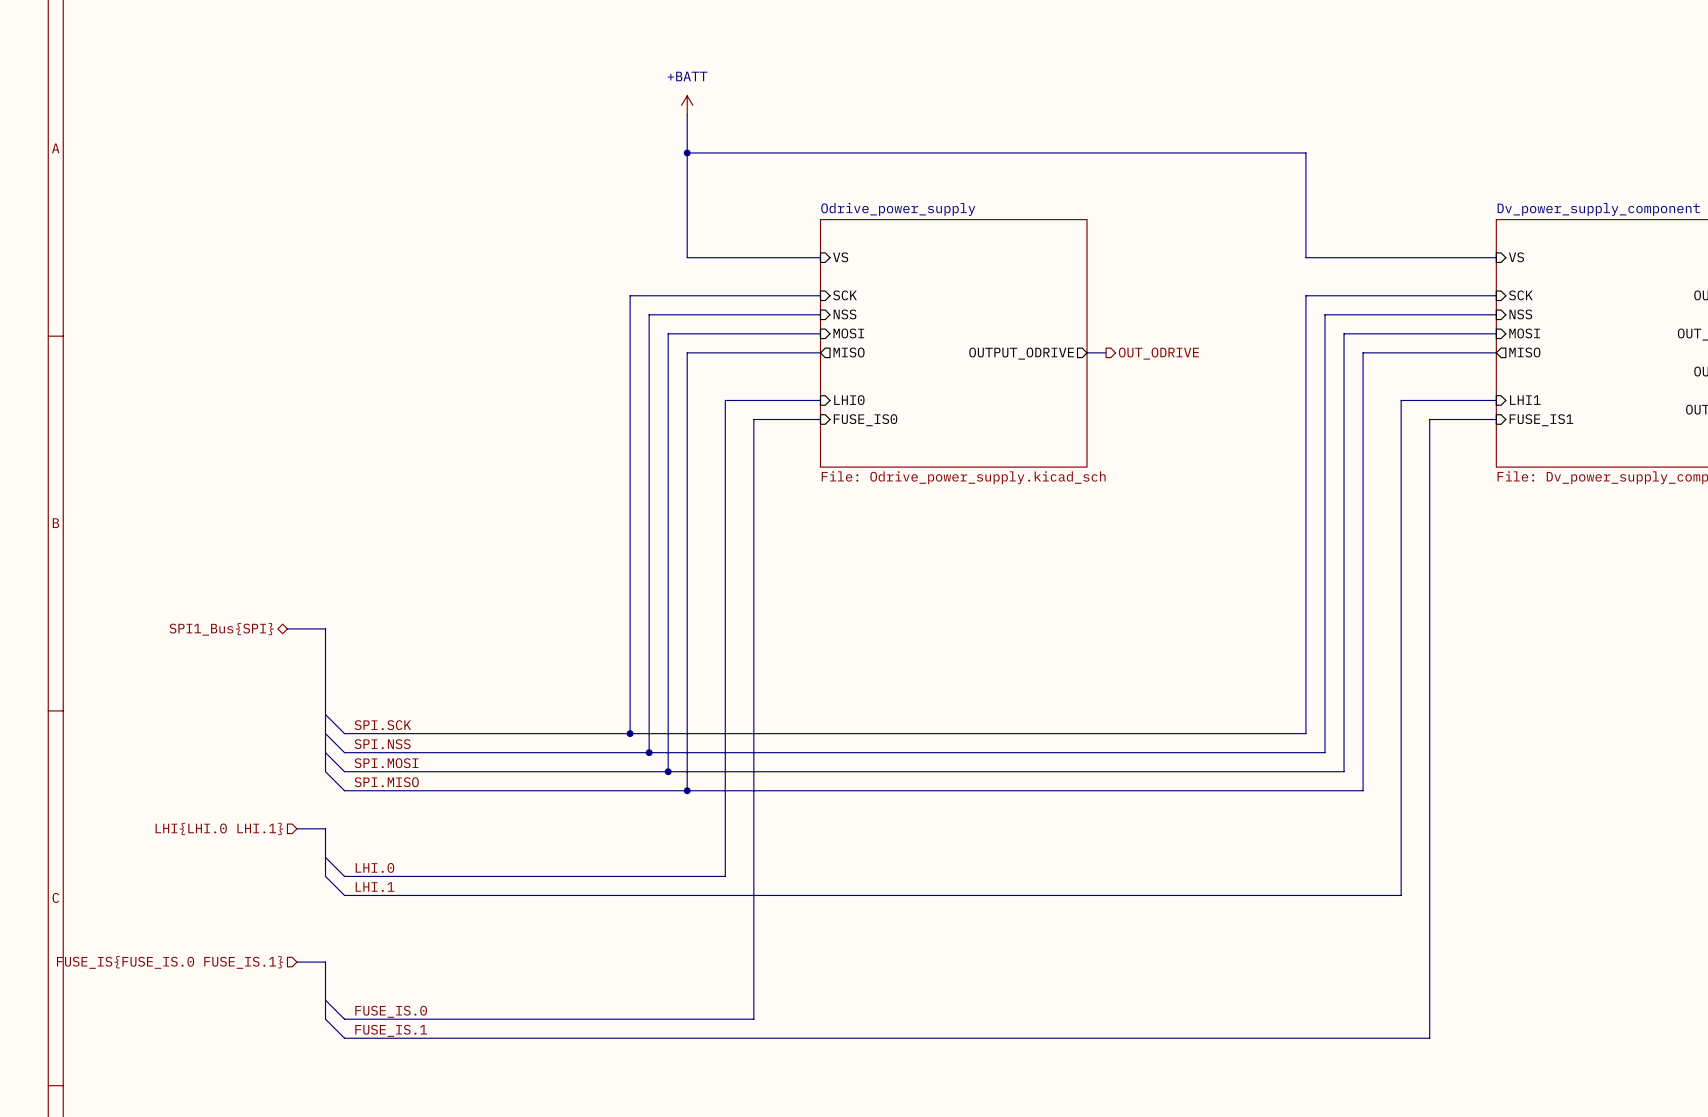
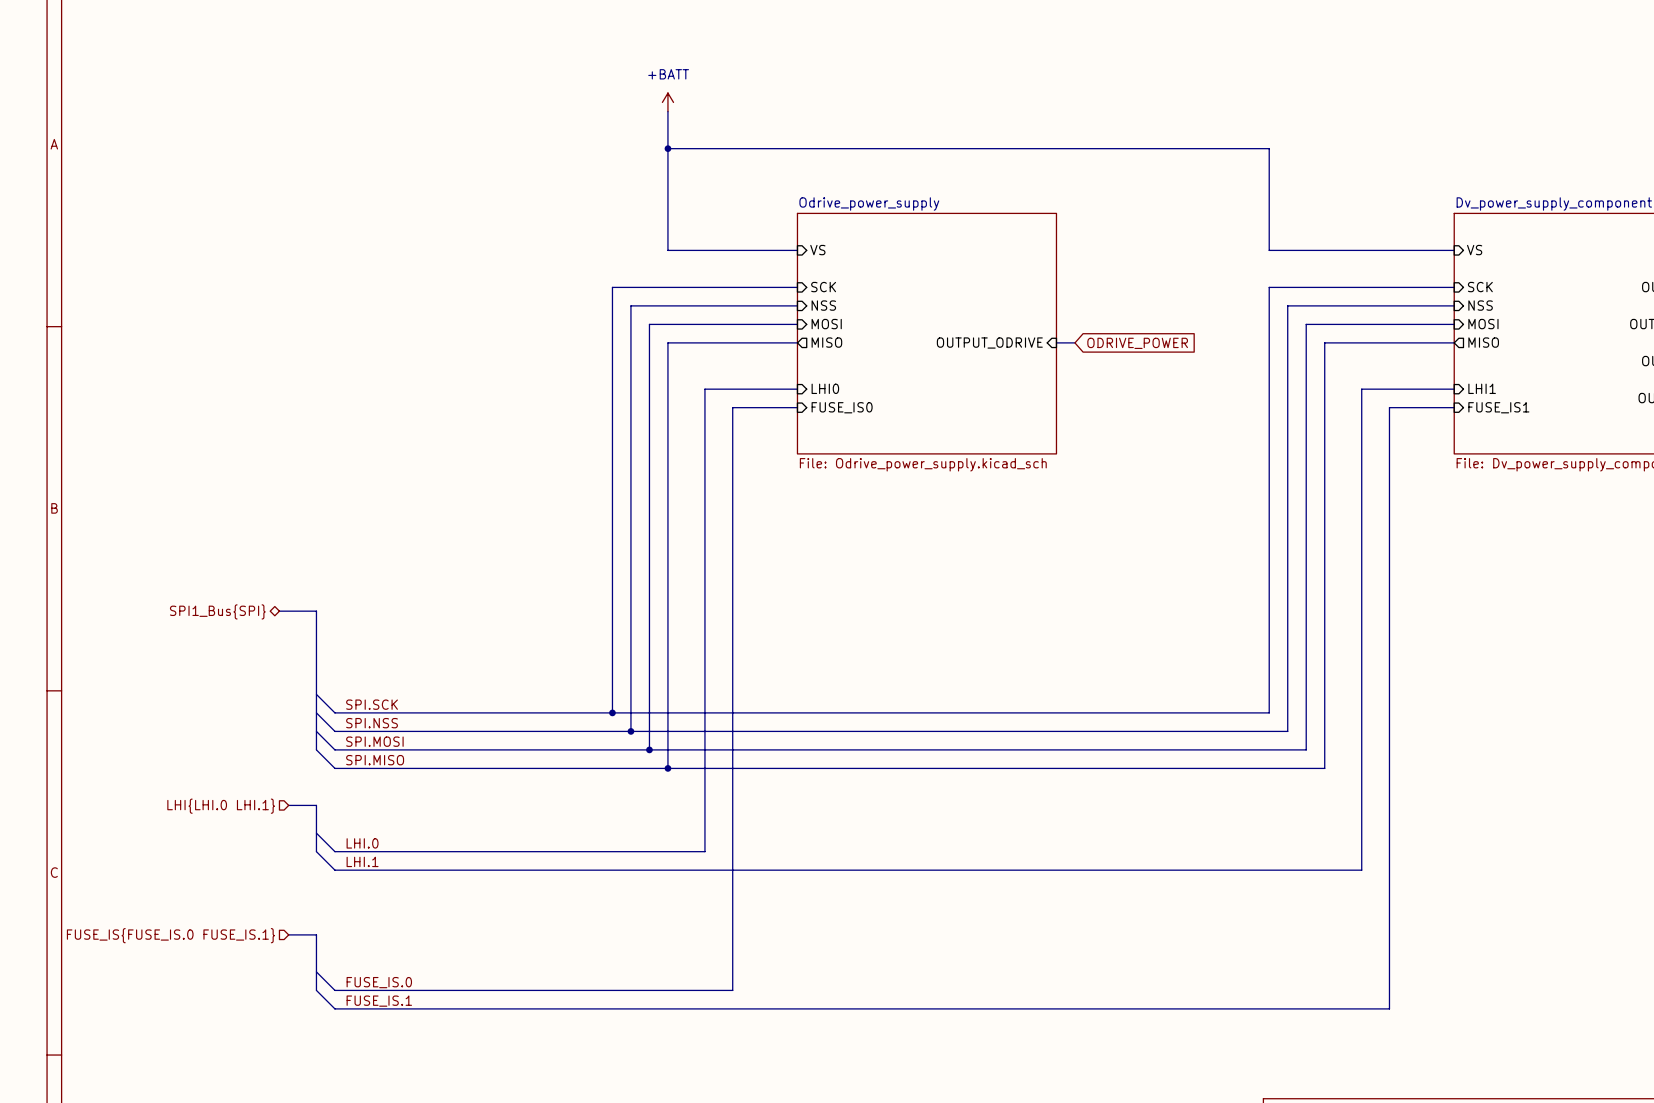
sheet pin shape: output (1021, 353) -> input (989, 343)
hierarchical label: OUT_ODRIVE (1158, 353) -> none
global label: none -> ODRIVE_POWER (1137, 343)

